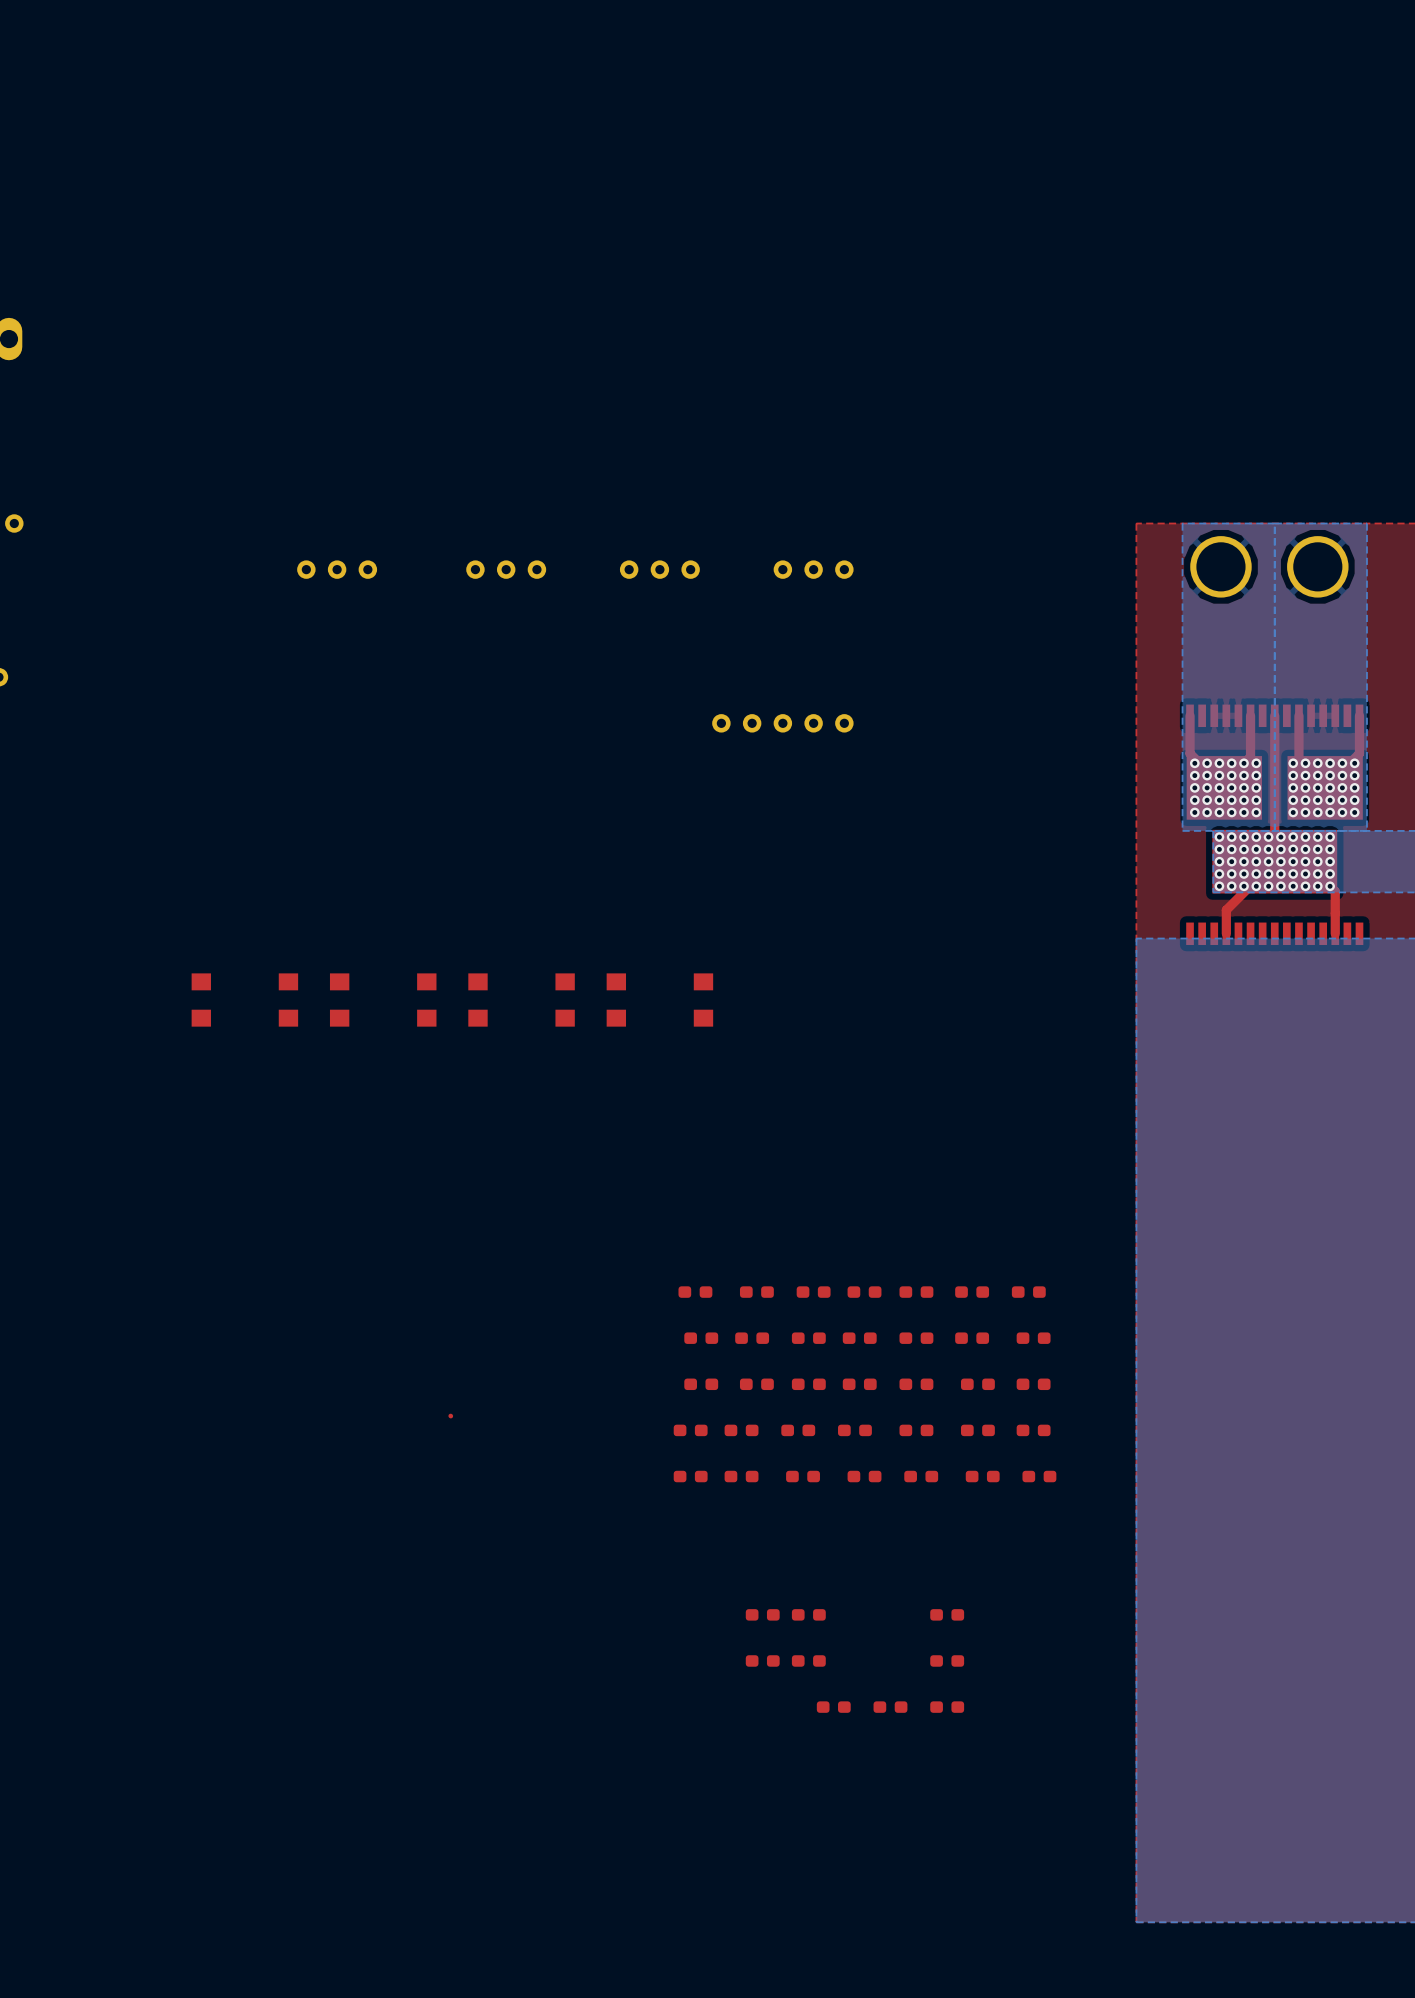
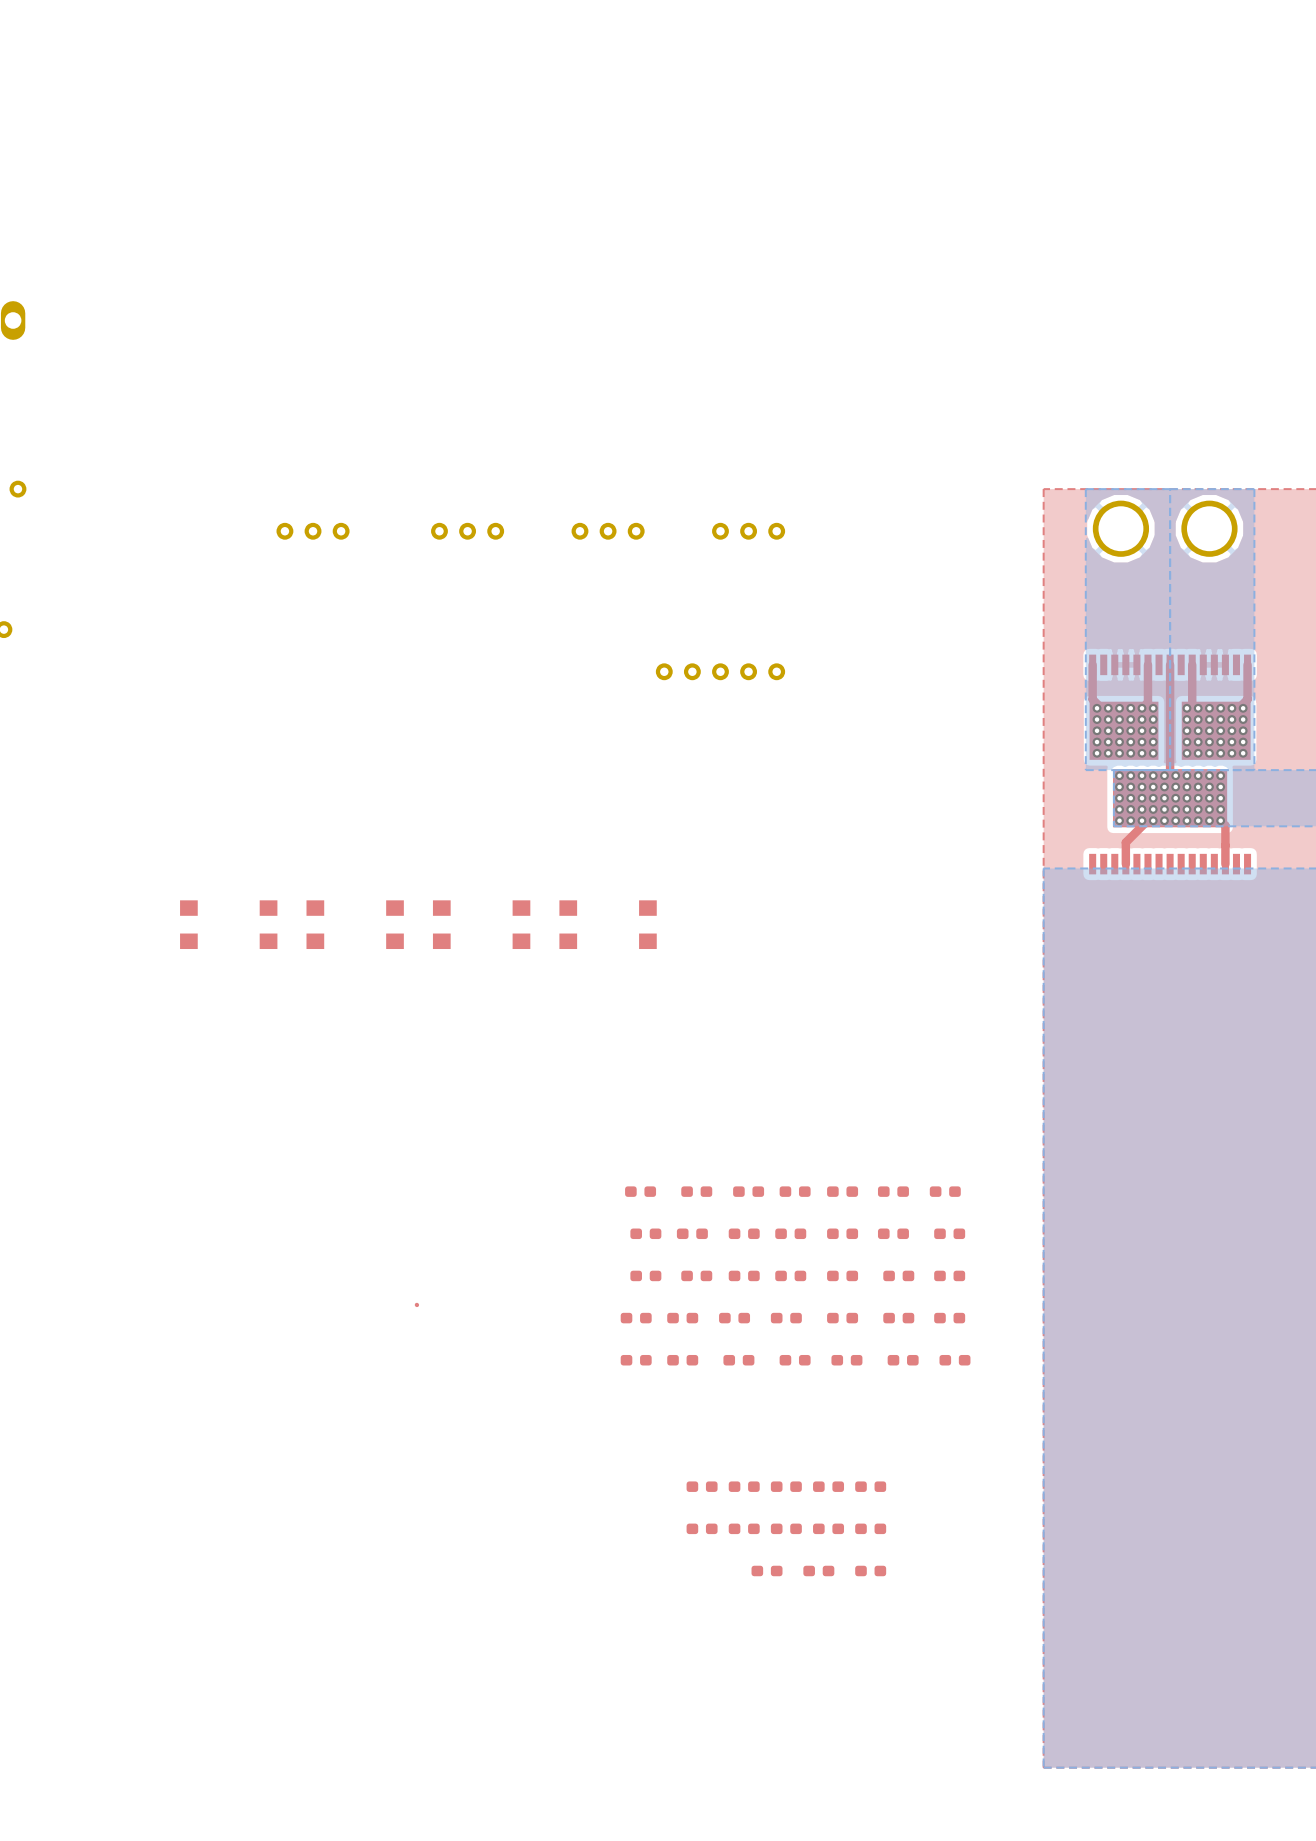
part: none -> (786, 1486)
part: none -> (828, 1486)
part: none -> (786, 1528)
part: none -> (828, 1528)

